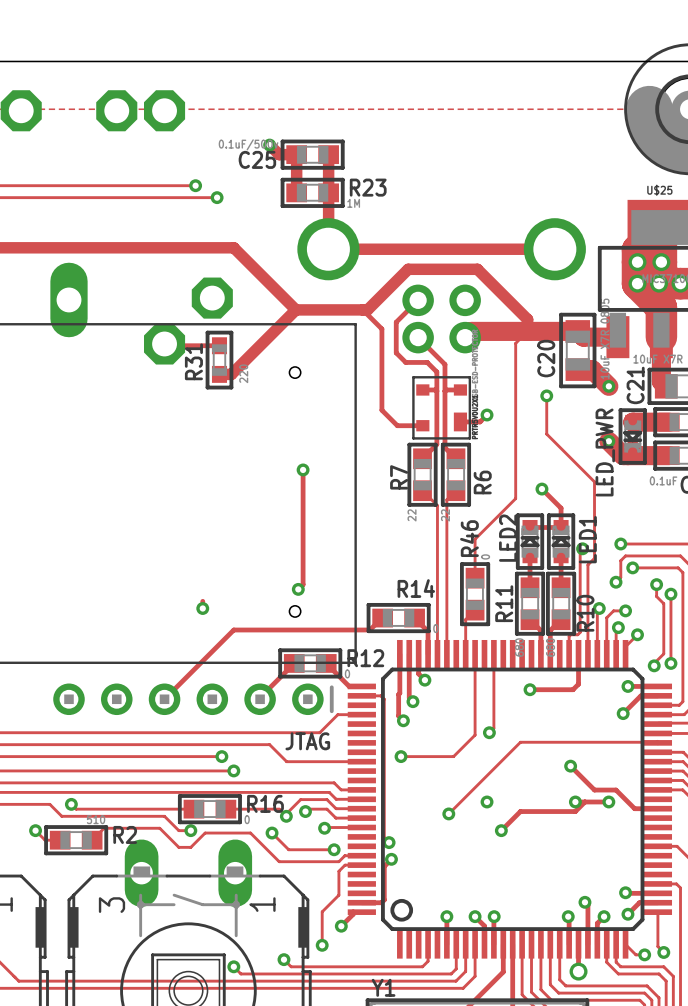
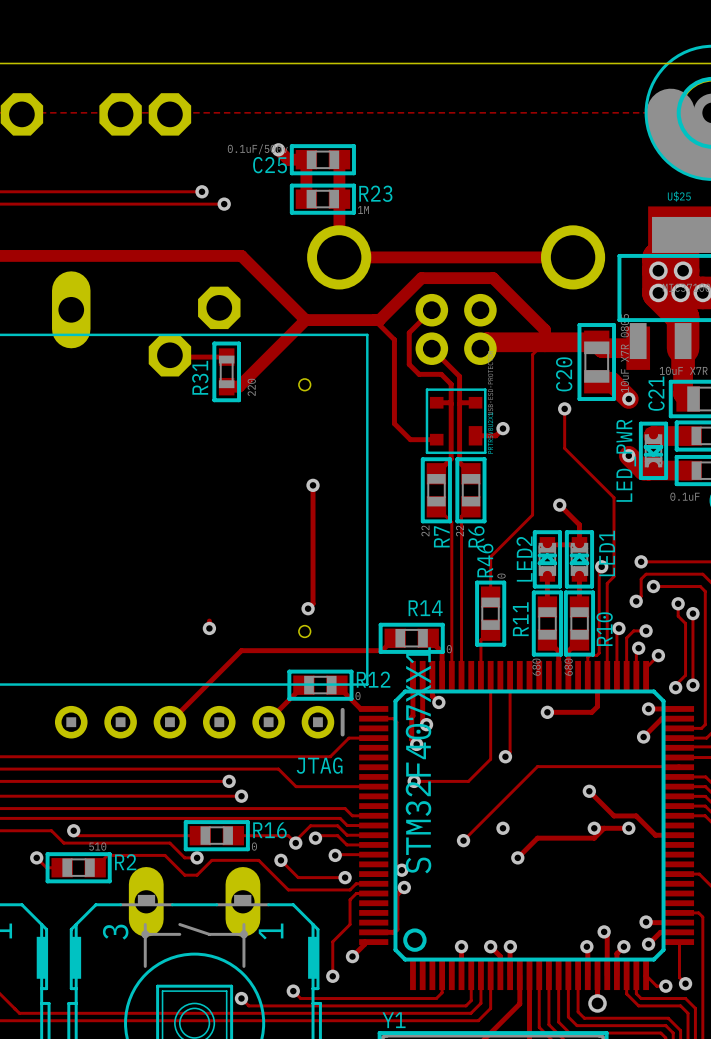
R7 name position: R7 (399, 477) -> R7 (441, 536)
R6 name position: R6 (482, 482) -> R6 (476, 536)
STM32F407XX1 name: none -> STM32F407XX1 (418, 760)

